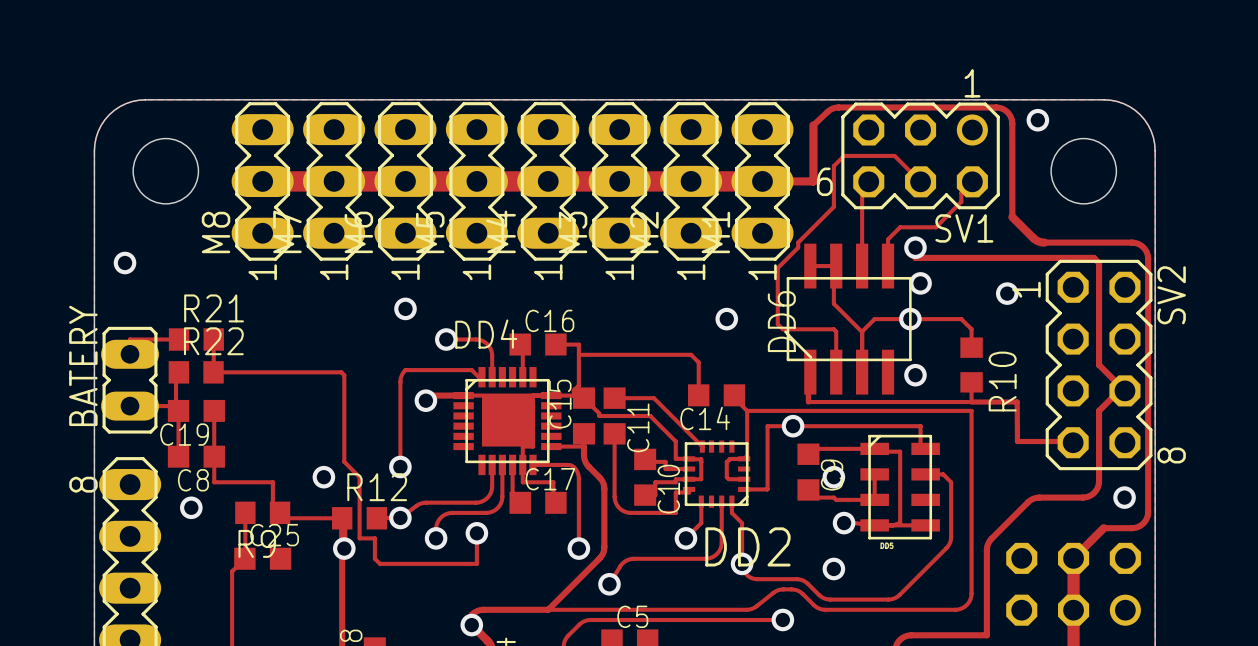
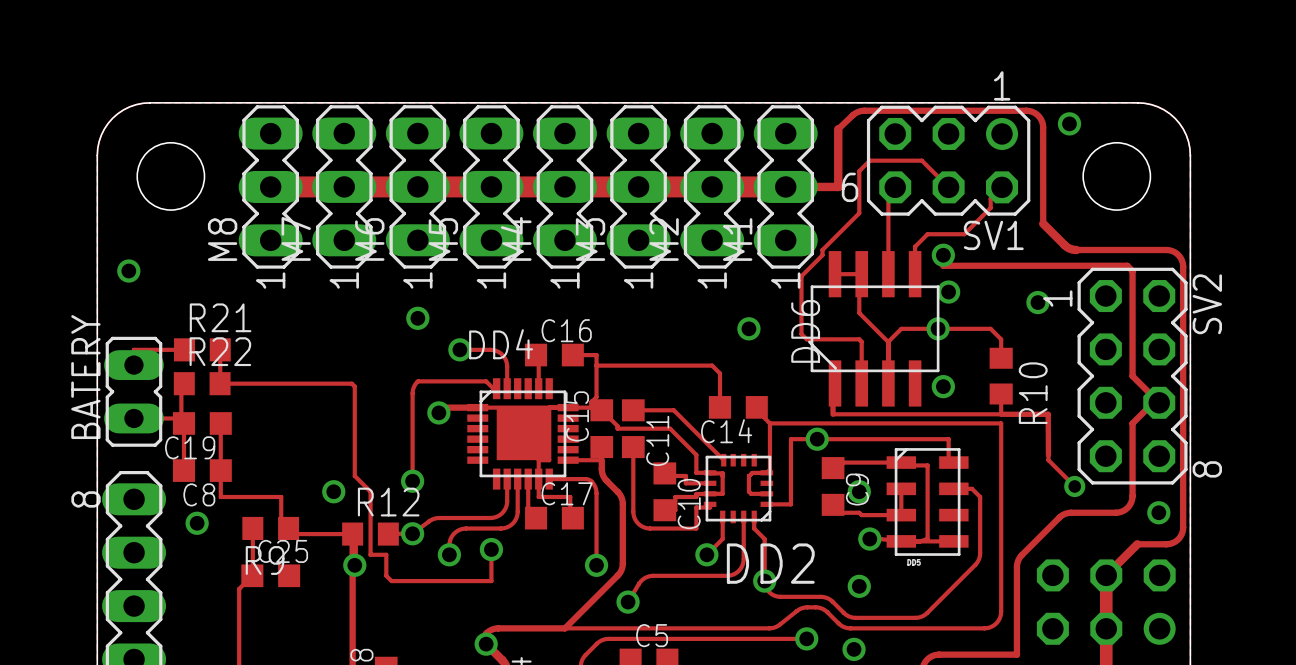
track: (1017, 441) (1073, 441) -> (1048, 454) (1048, 460) (1074, 486)
via: none -> (1074, 486)
via: none -> (854, 649)

